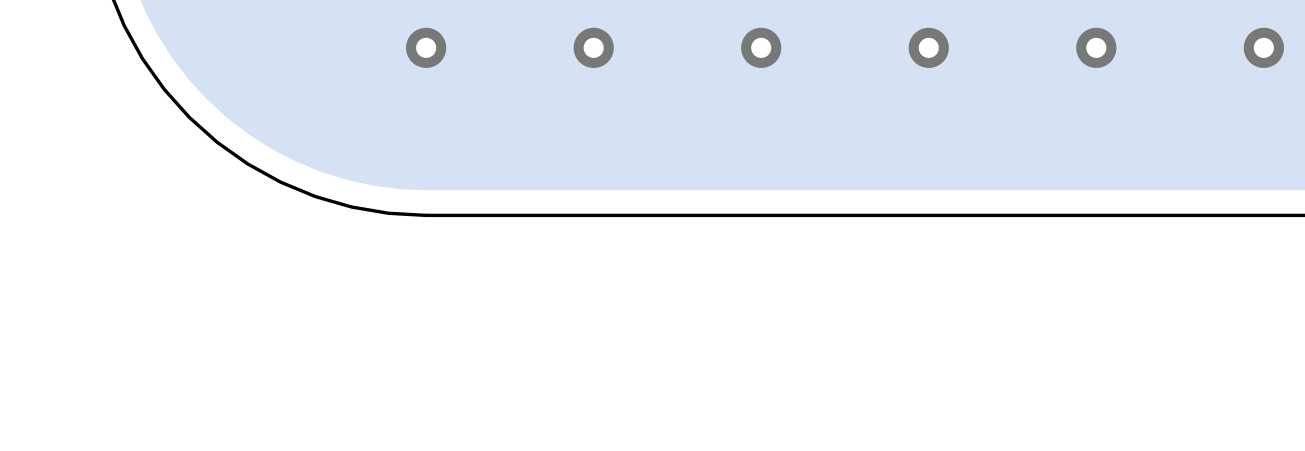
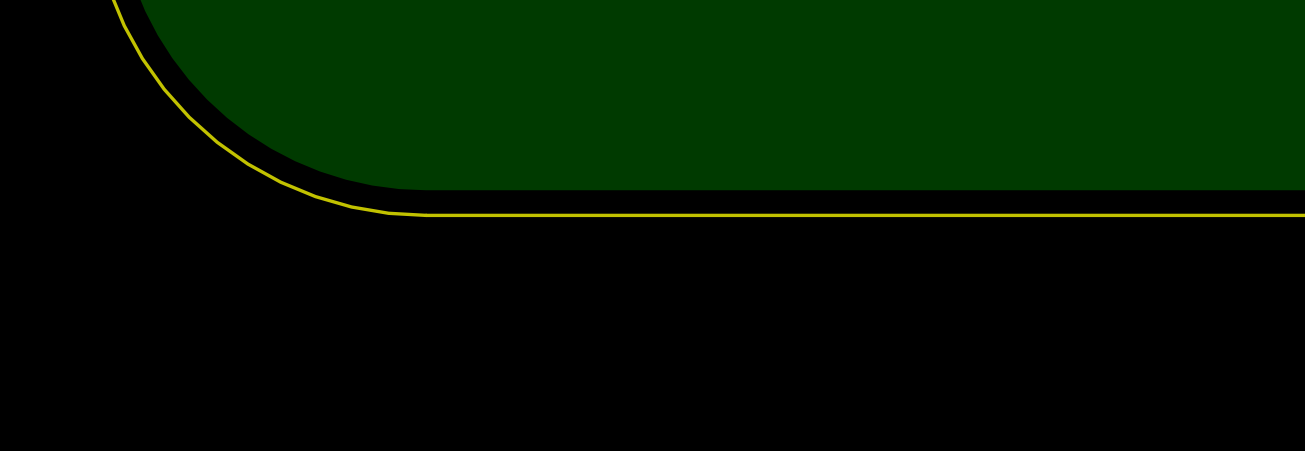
via: (426, 47) -> none
via: (593, 47) -> none
via: (761, 47) -> none
via: (928, 47) -> none
via: (1096, 47) -> none
via: (1263, 47) -> none

